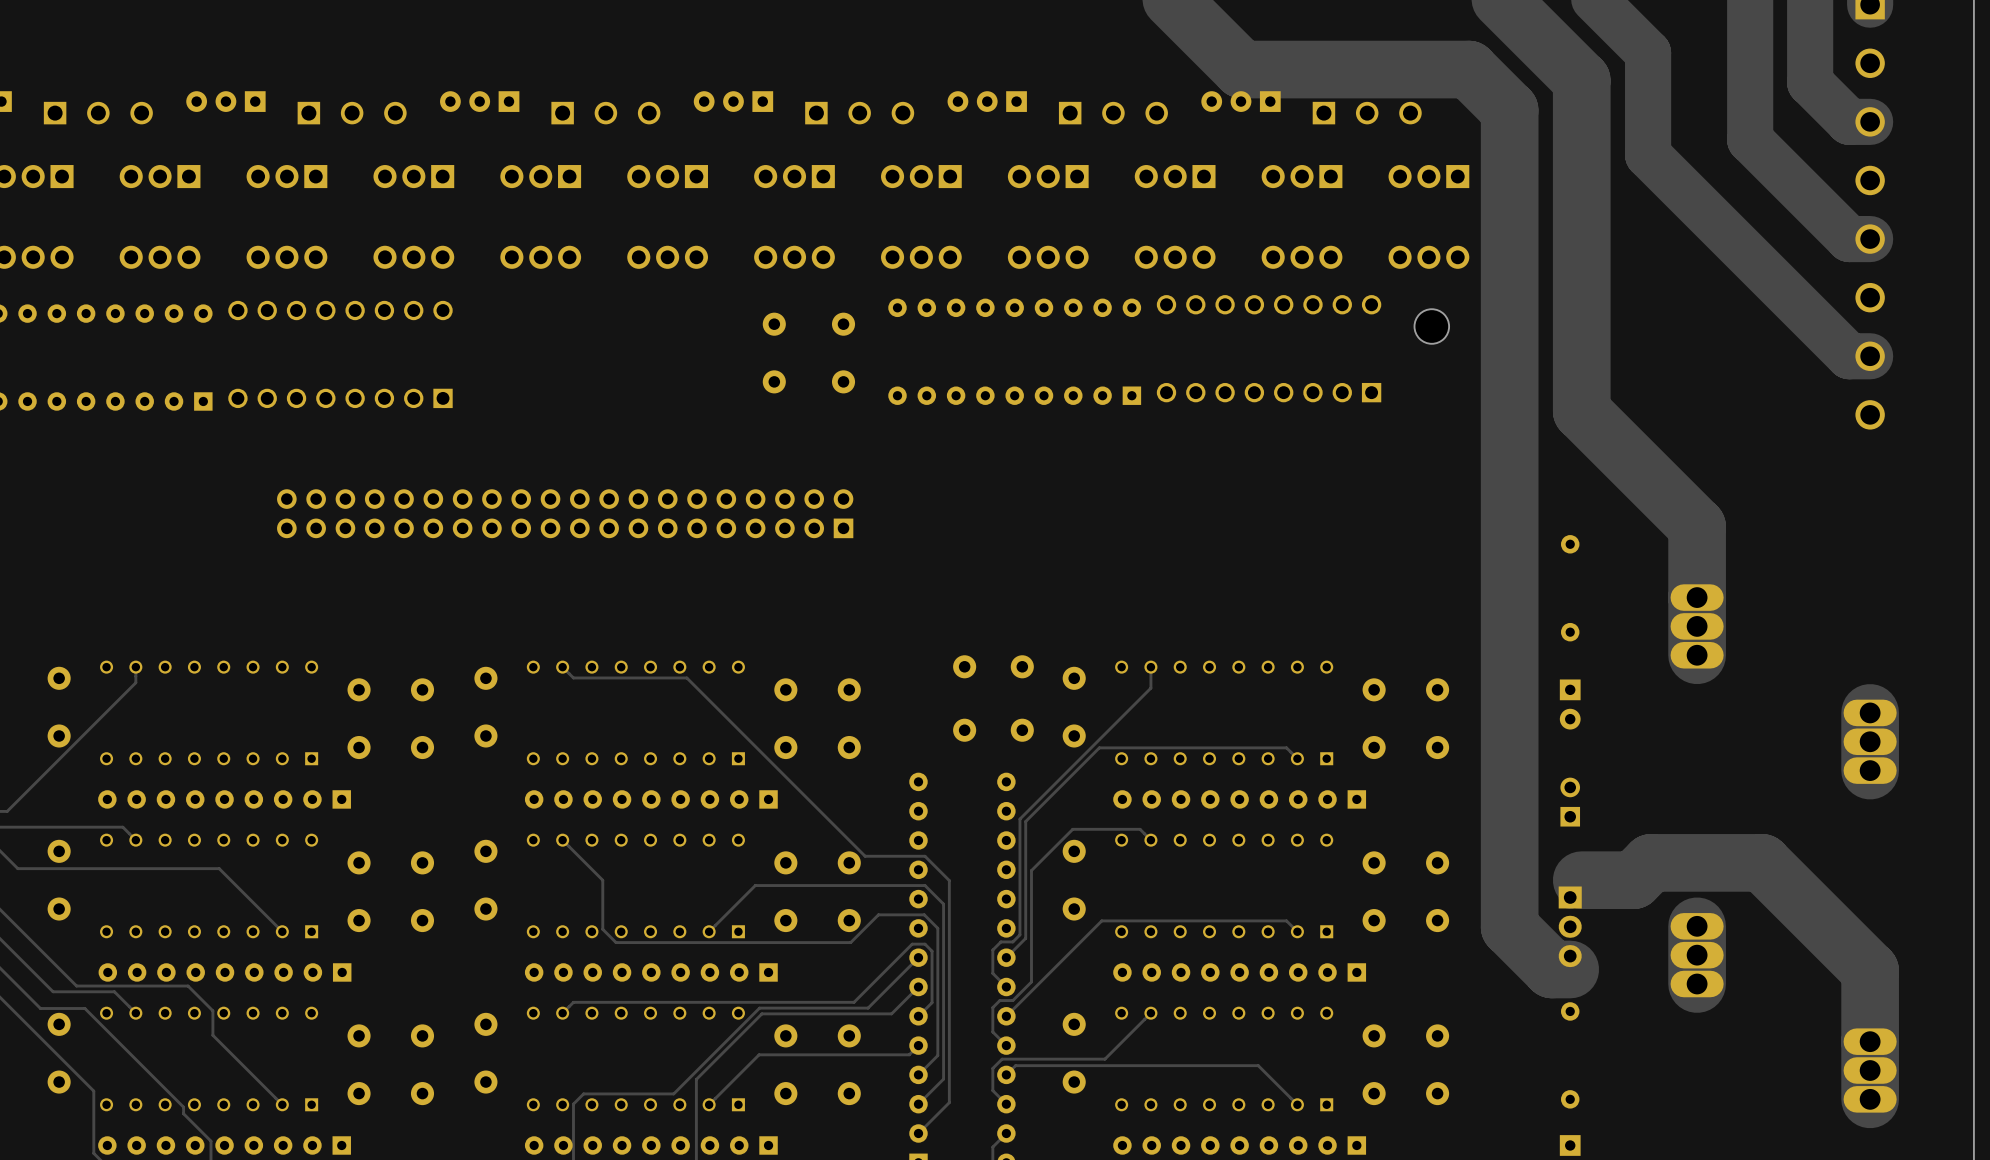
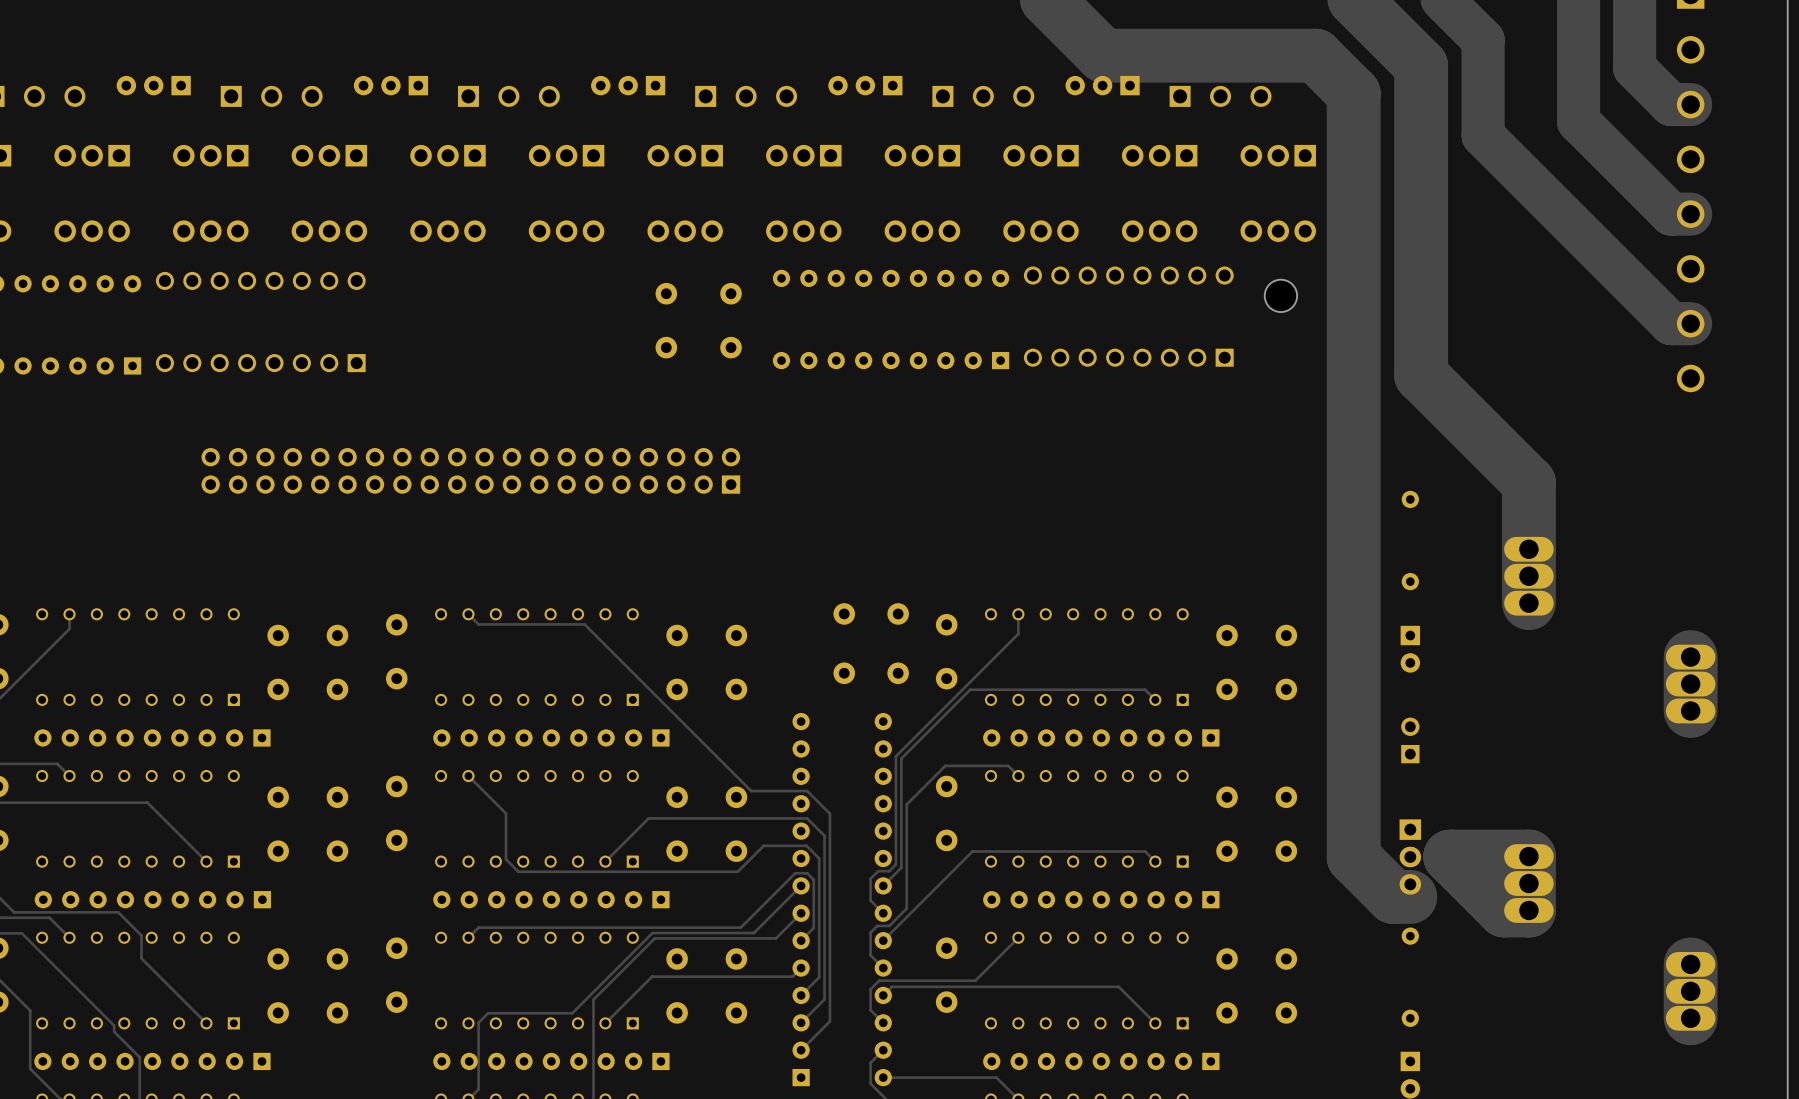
track: (1581, 880) (1633, 880) (1650, 862) (1762, 862) (1870, 970) (1870, 1041) -> none
track: none -> (1528, 856) (1450, 856) (1504, 910) (1528, 910)

